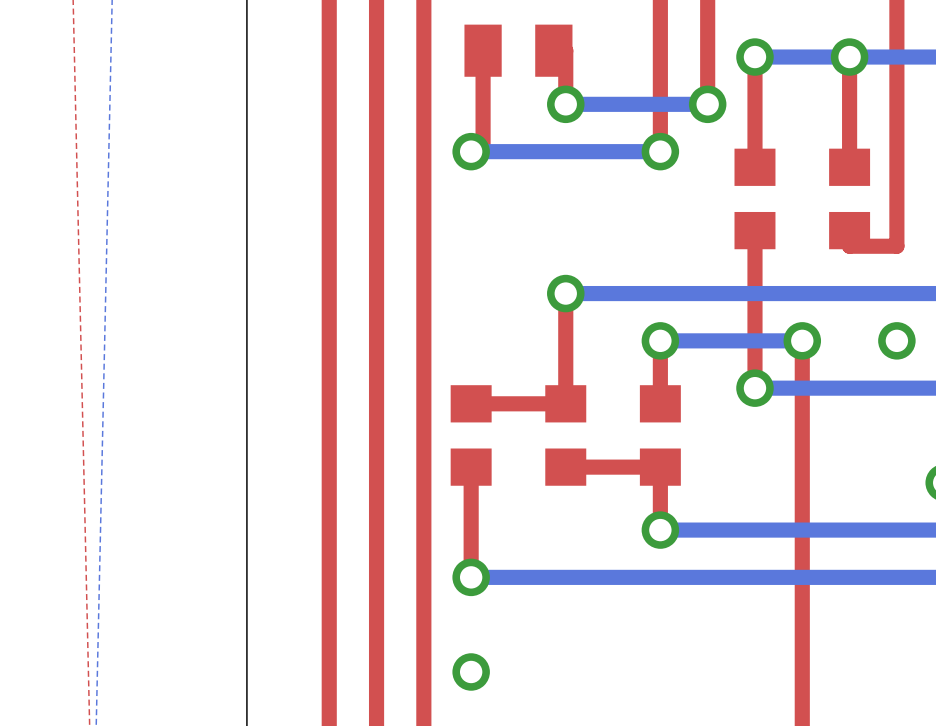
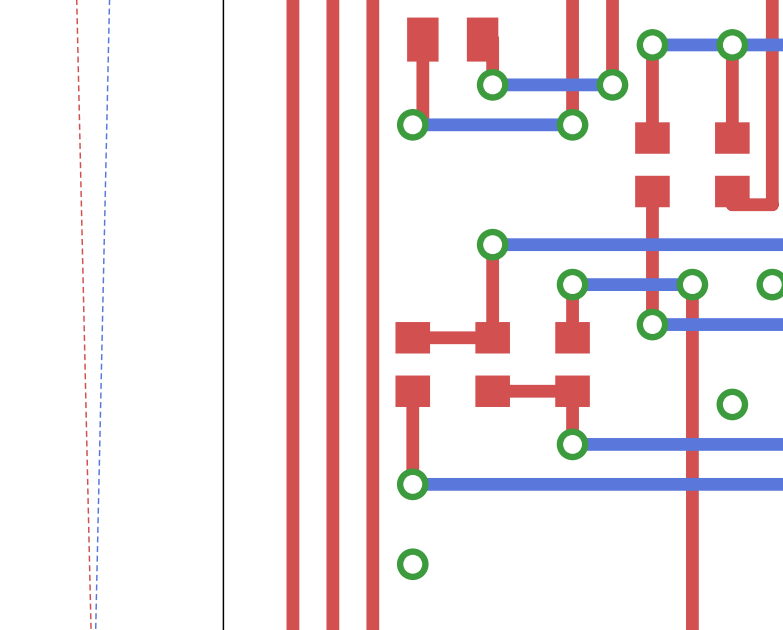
via: none -> (732, 404)

